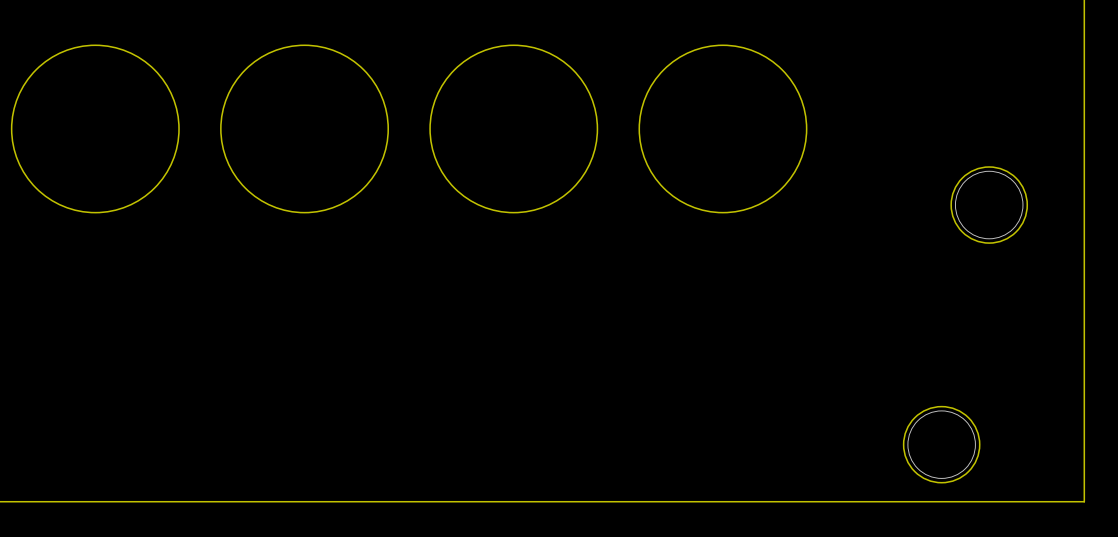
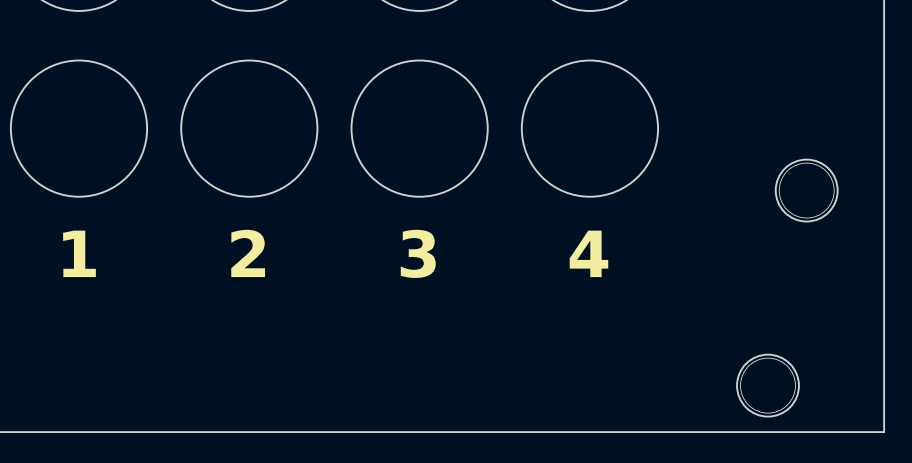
text: none -> 4 (588, 253)
text: none -> 1 (79, 253)
text: none -> 2 (248, 253)
text: none -> 3 (418, 253)

